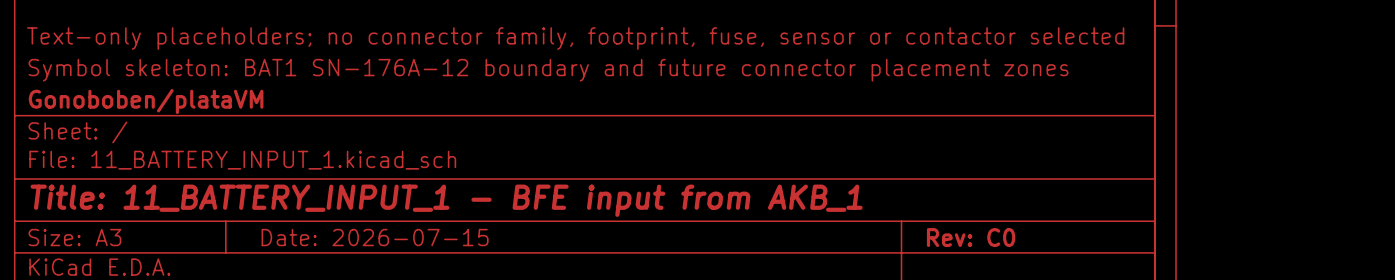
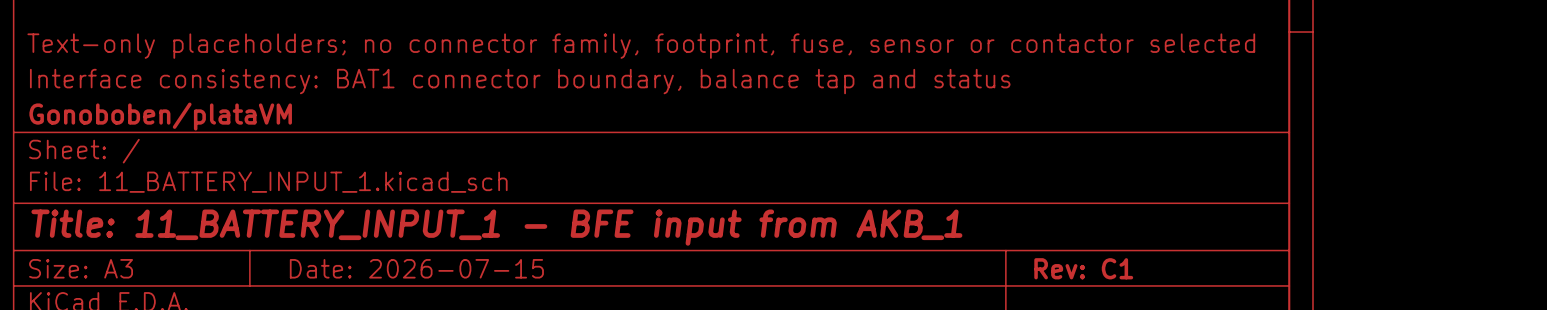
title block: Symbol skeleton: BAT1 SN-176A-12 boundary and future connector placement zones (548, 70) -> Interface consistency: BAT1 connector boundary, balance tap and status (520, 81)
title block: Rev: C0 (971, 237) -> Rev: C1 (1083, 268)

